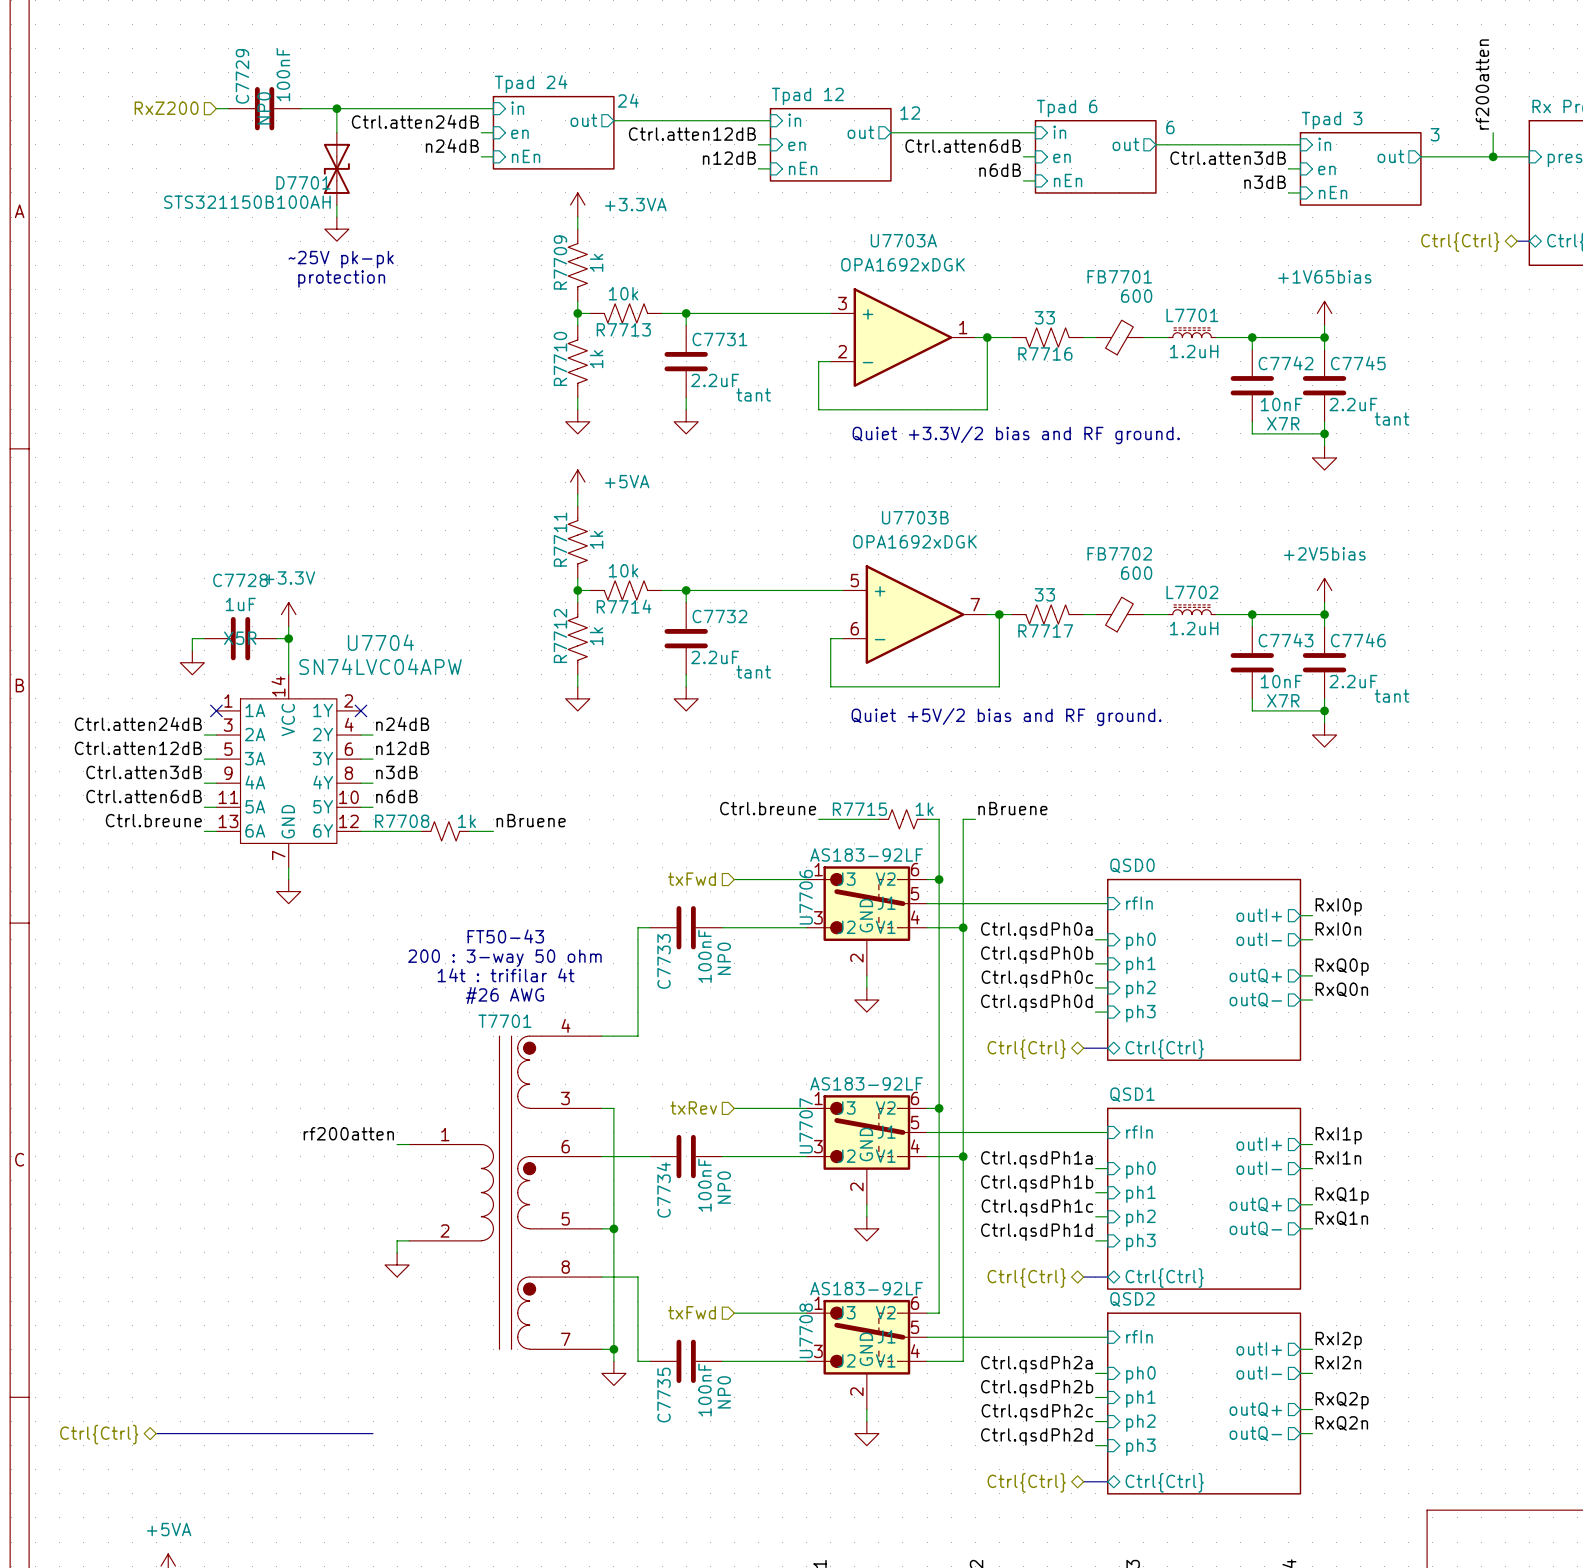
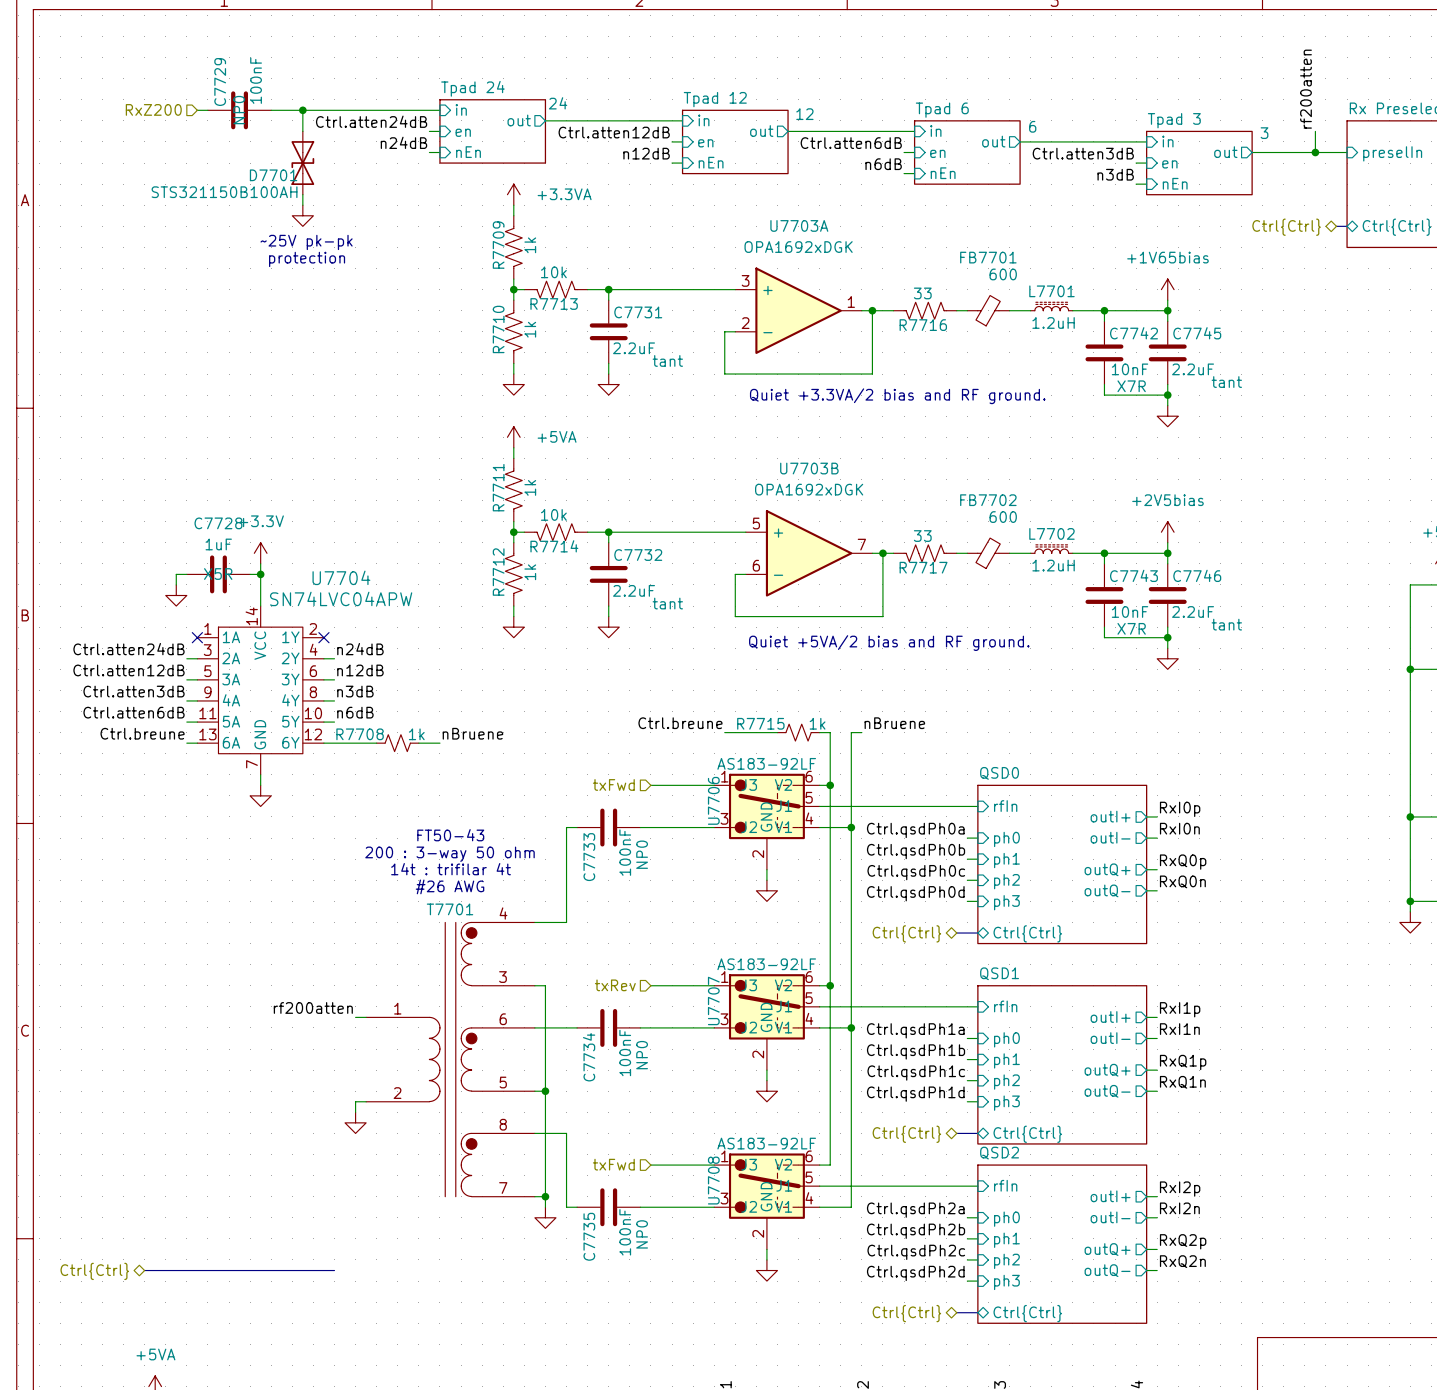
text: Quiet +3.3V/2 bias and RF ground. (1016, 435) -> Quiet +3.3VA/2 bias and RF ground. (897, 396)
text: Quiet +5V/2 bias and RF ground. (1006, 717) -> Quiet +5VA/2 bias and RF ground. (889, 643)

